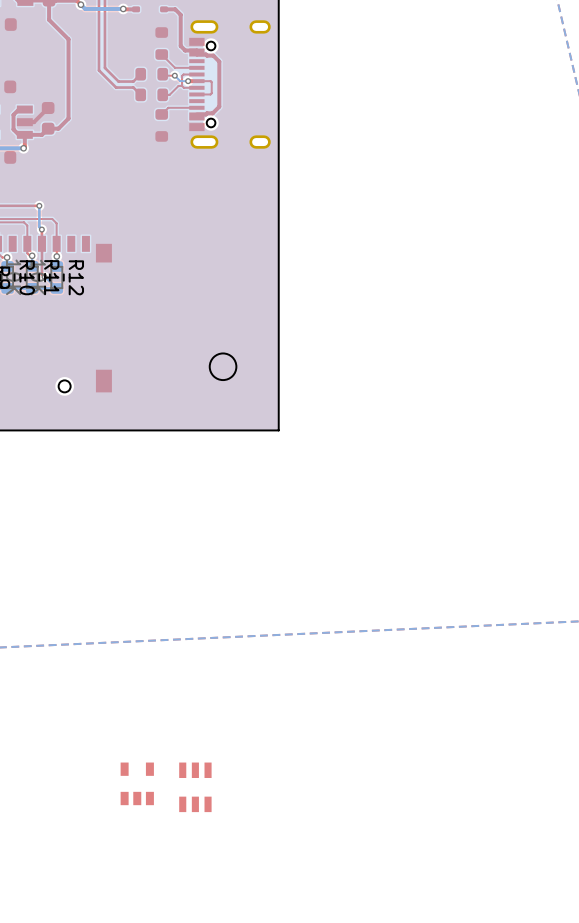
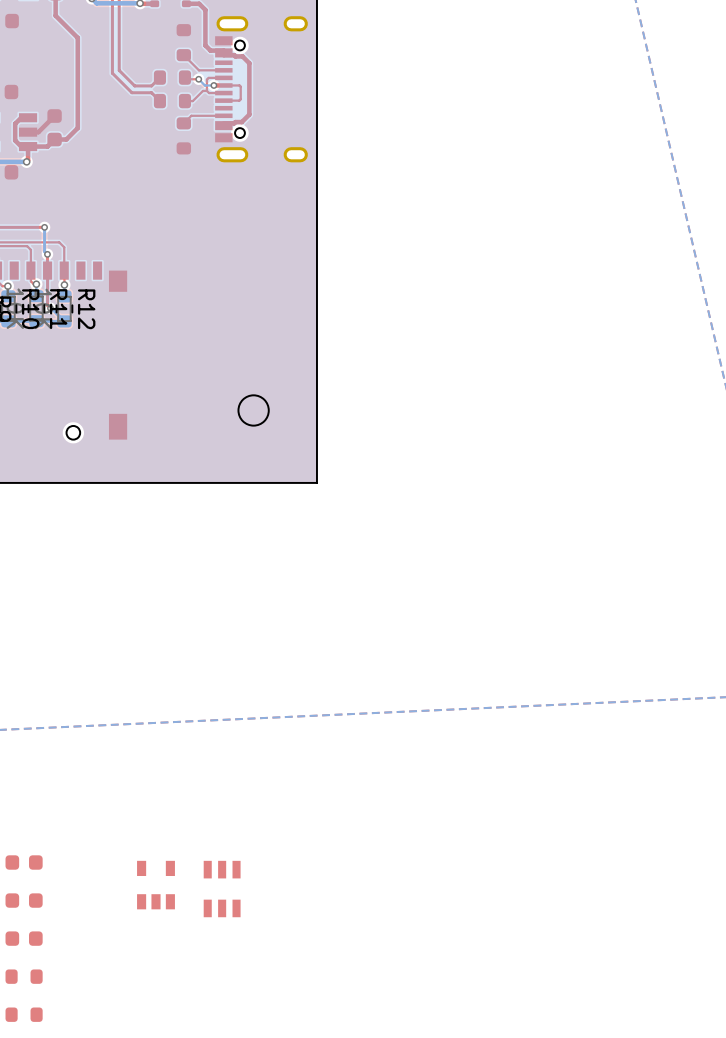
part: none -> (24, 862)
part: none -> (24, 900)
part: none -> (24, 938)
part: none -> (24, 976)
part: none -> (24, 1014)

